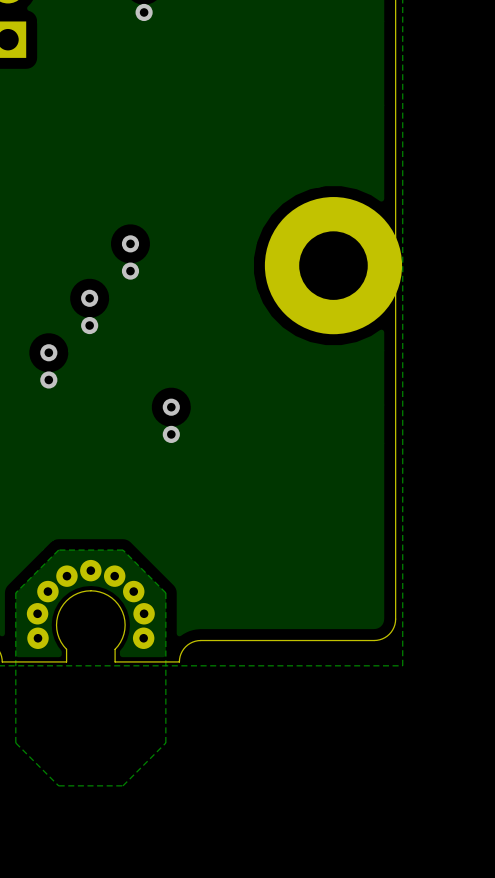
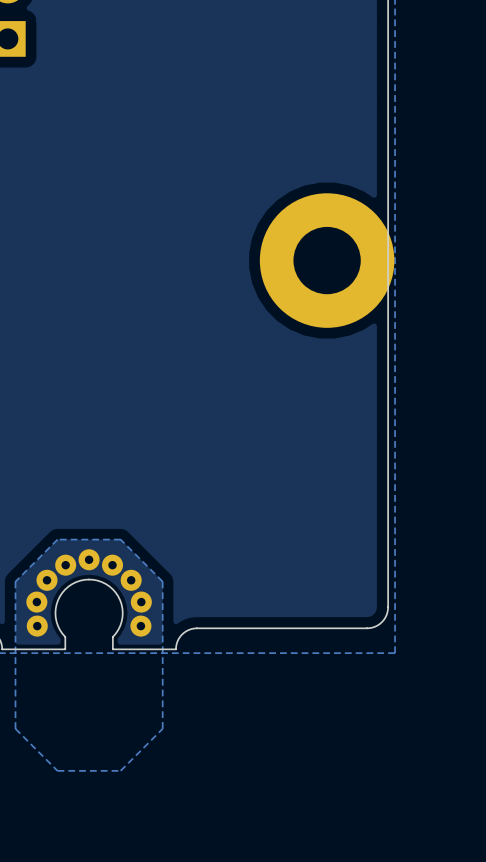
via: (144, 12) -> none
via: (130, 243) -> none
via: (130, 271) -> none
via: (89, 298) -> none
via: (89, 325) -> none
via: (48, 352) -> none
via: (48, 379) -> none
via: (171, 407) -> none
via: (171, 434) -> none

